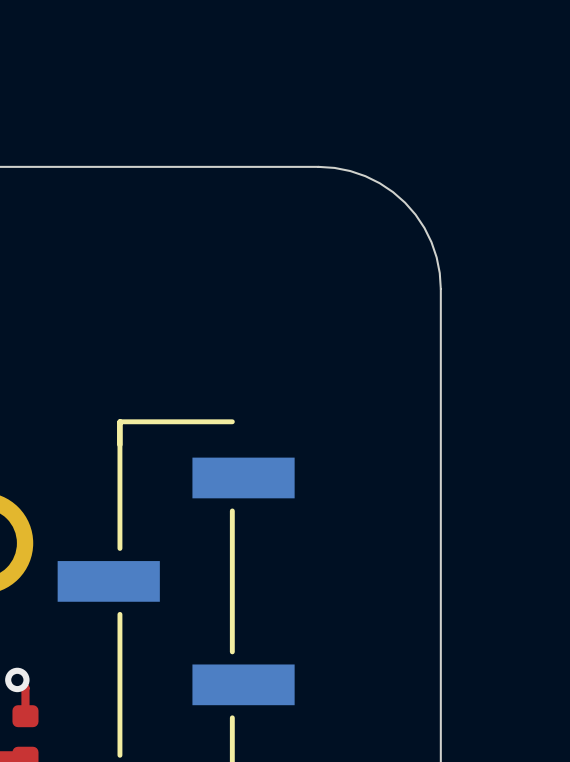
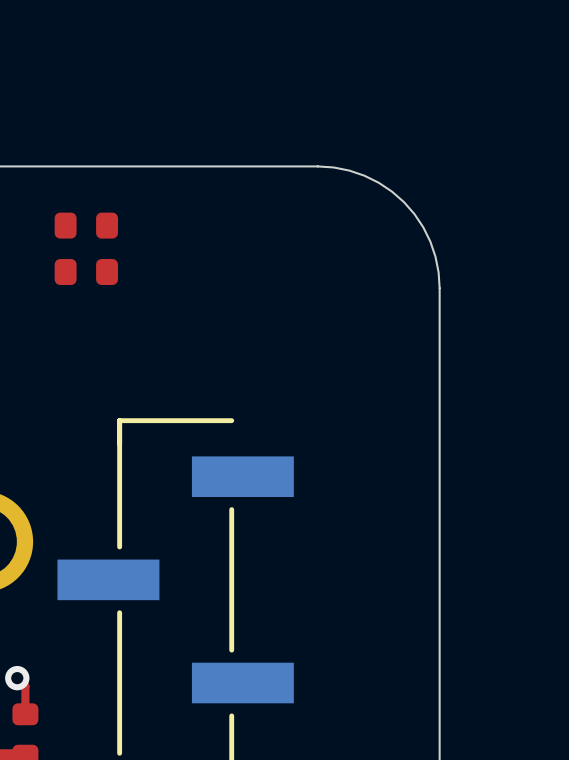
part: none -> (86, 225)
part: none -> (86, 272)

